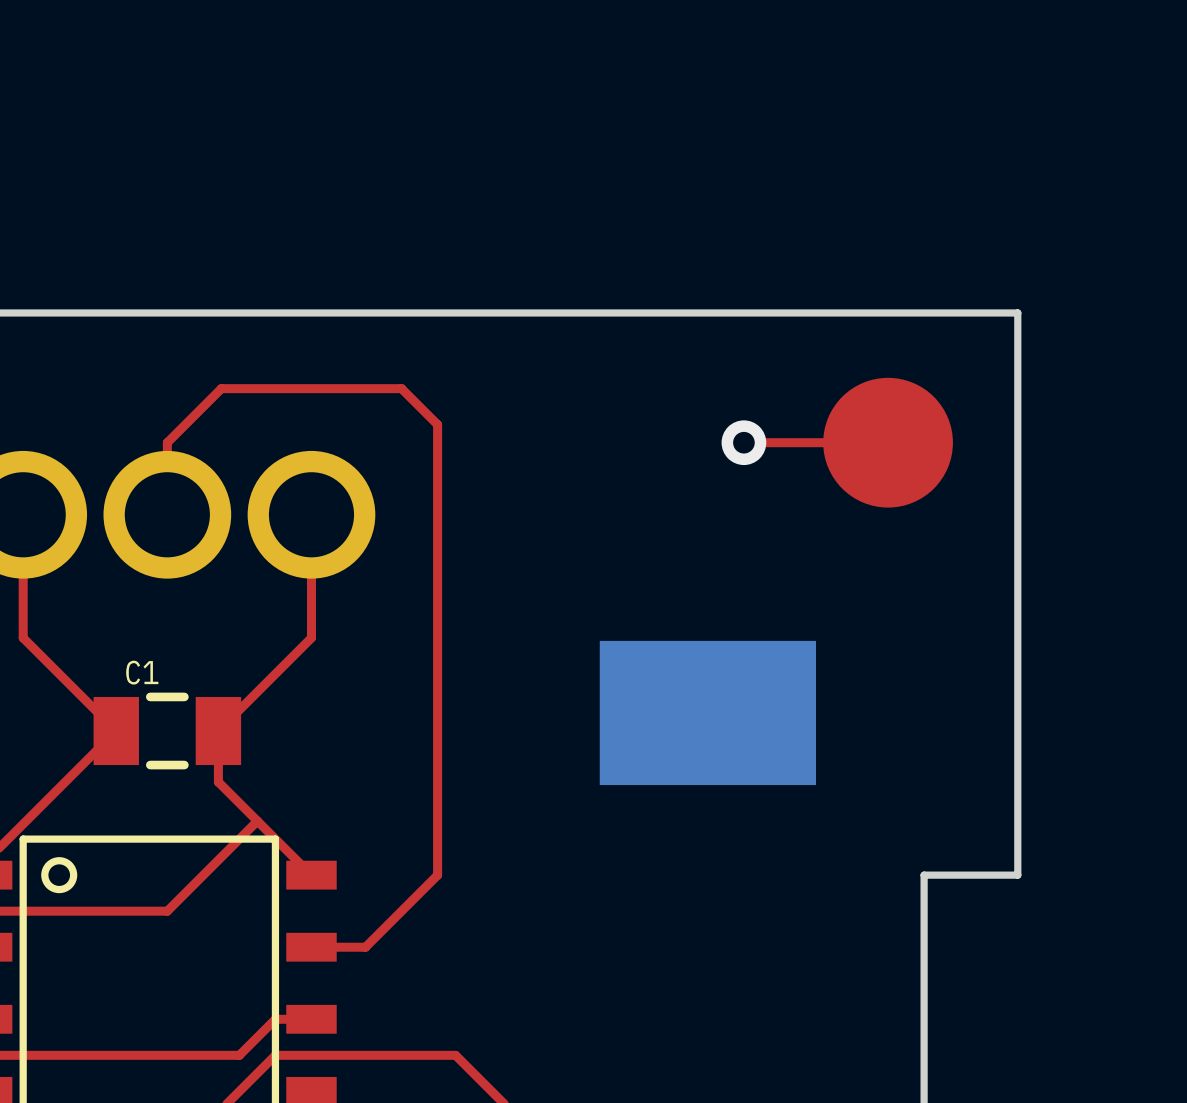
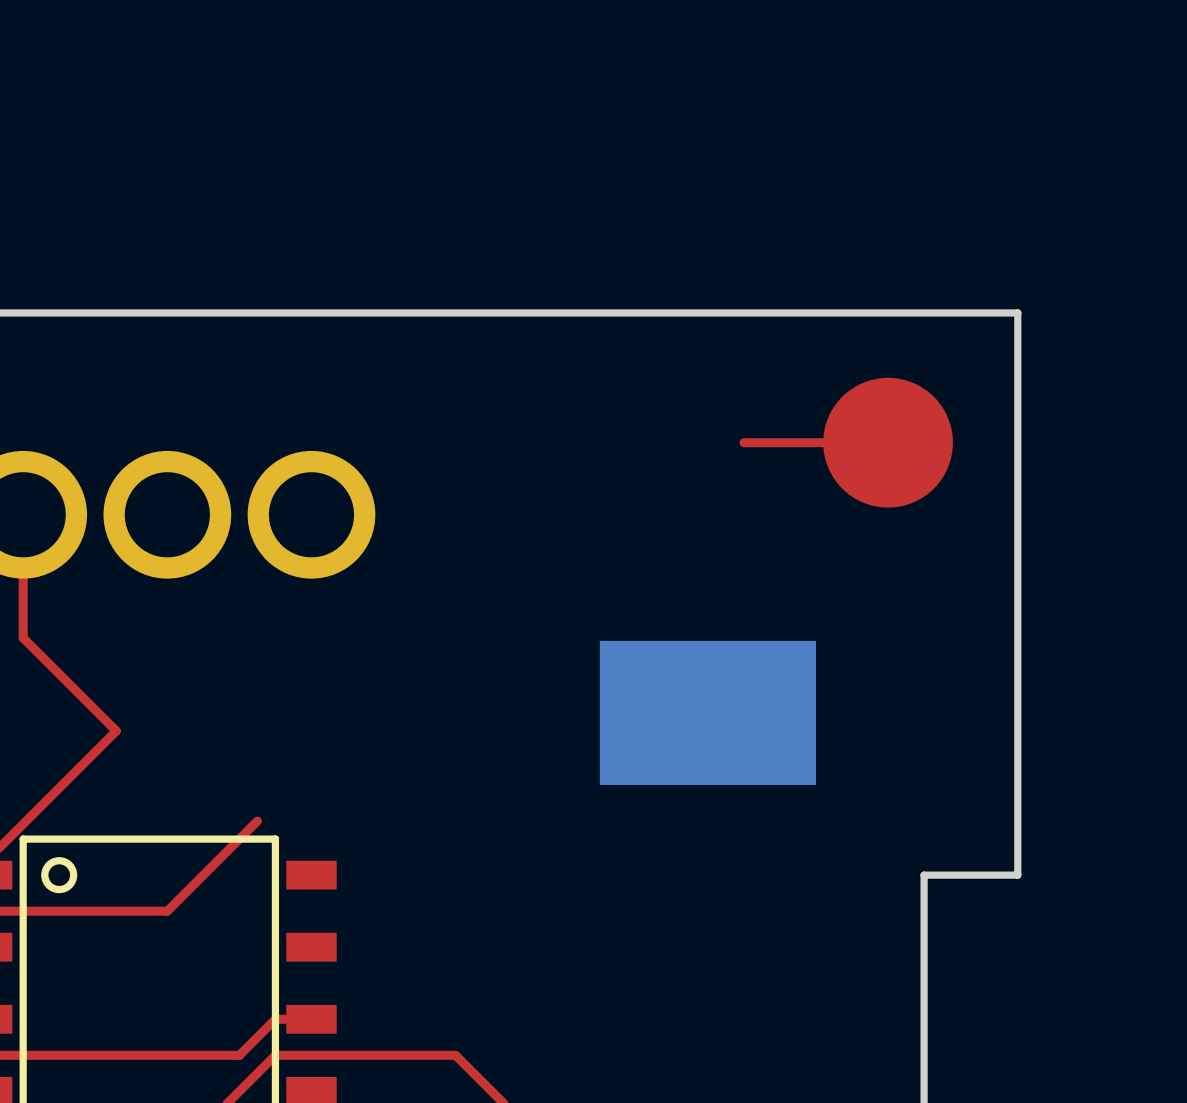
via: (743, 442) -> none
top track: (167, 514) (167, 442) (221, 388) (401, 388) (437, 424) (437, 875) (365, 947) (311, 947) -> none
top track: (311, 514) (311, 637) (218, 731) (218, 782) (311, 875) -> none
C1: (167, 731) -> none

